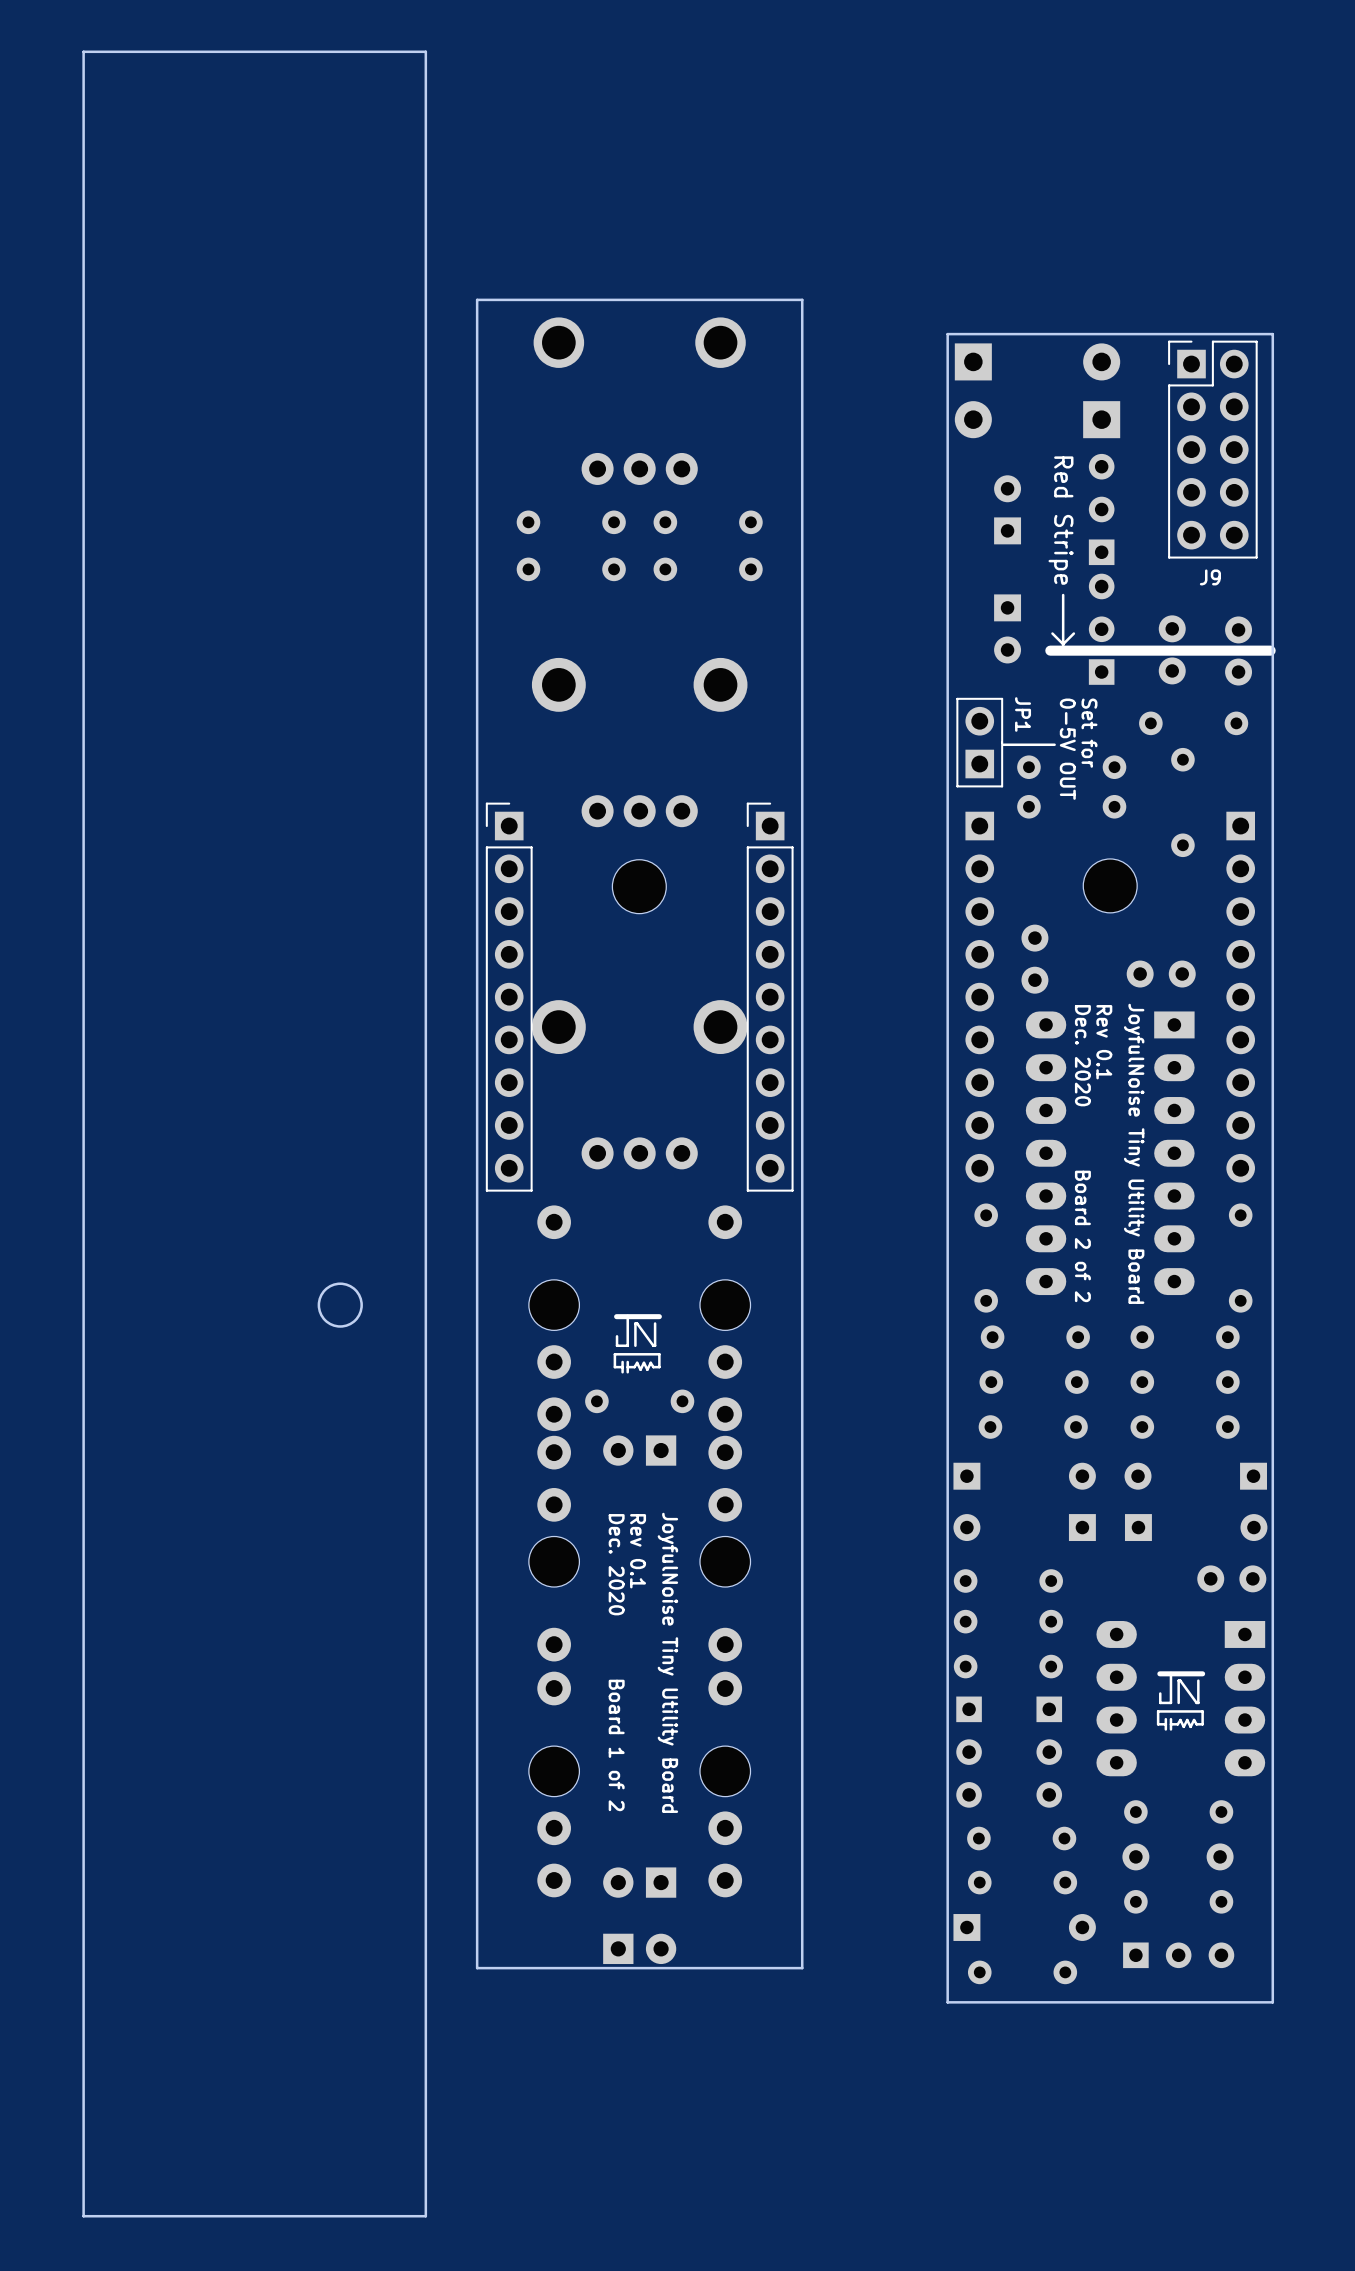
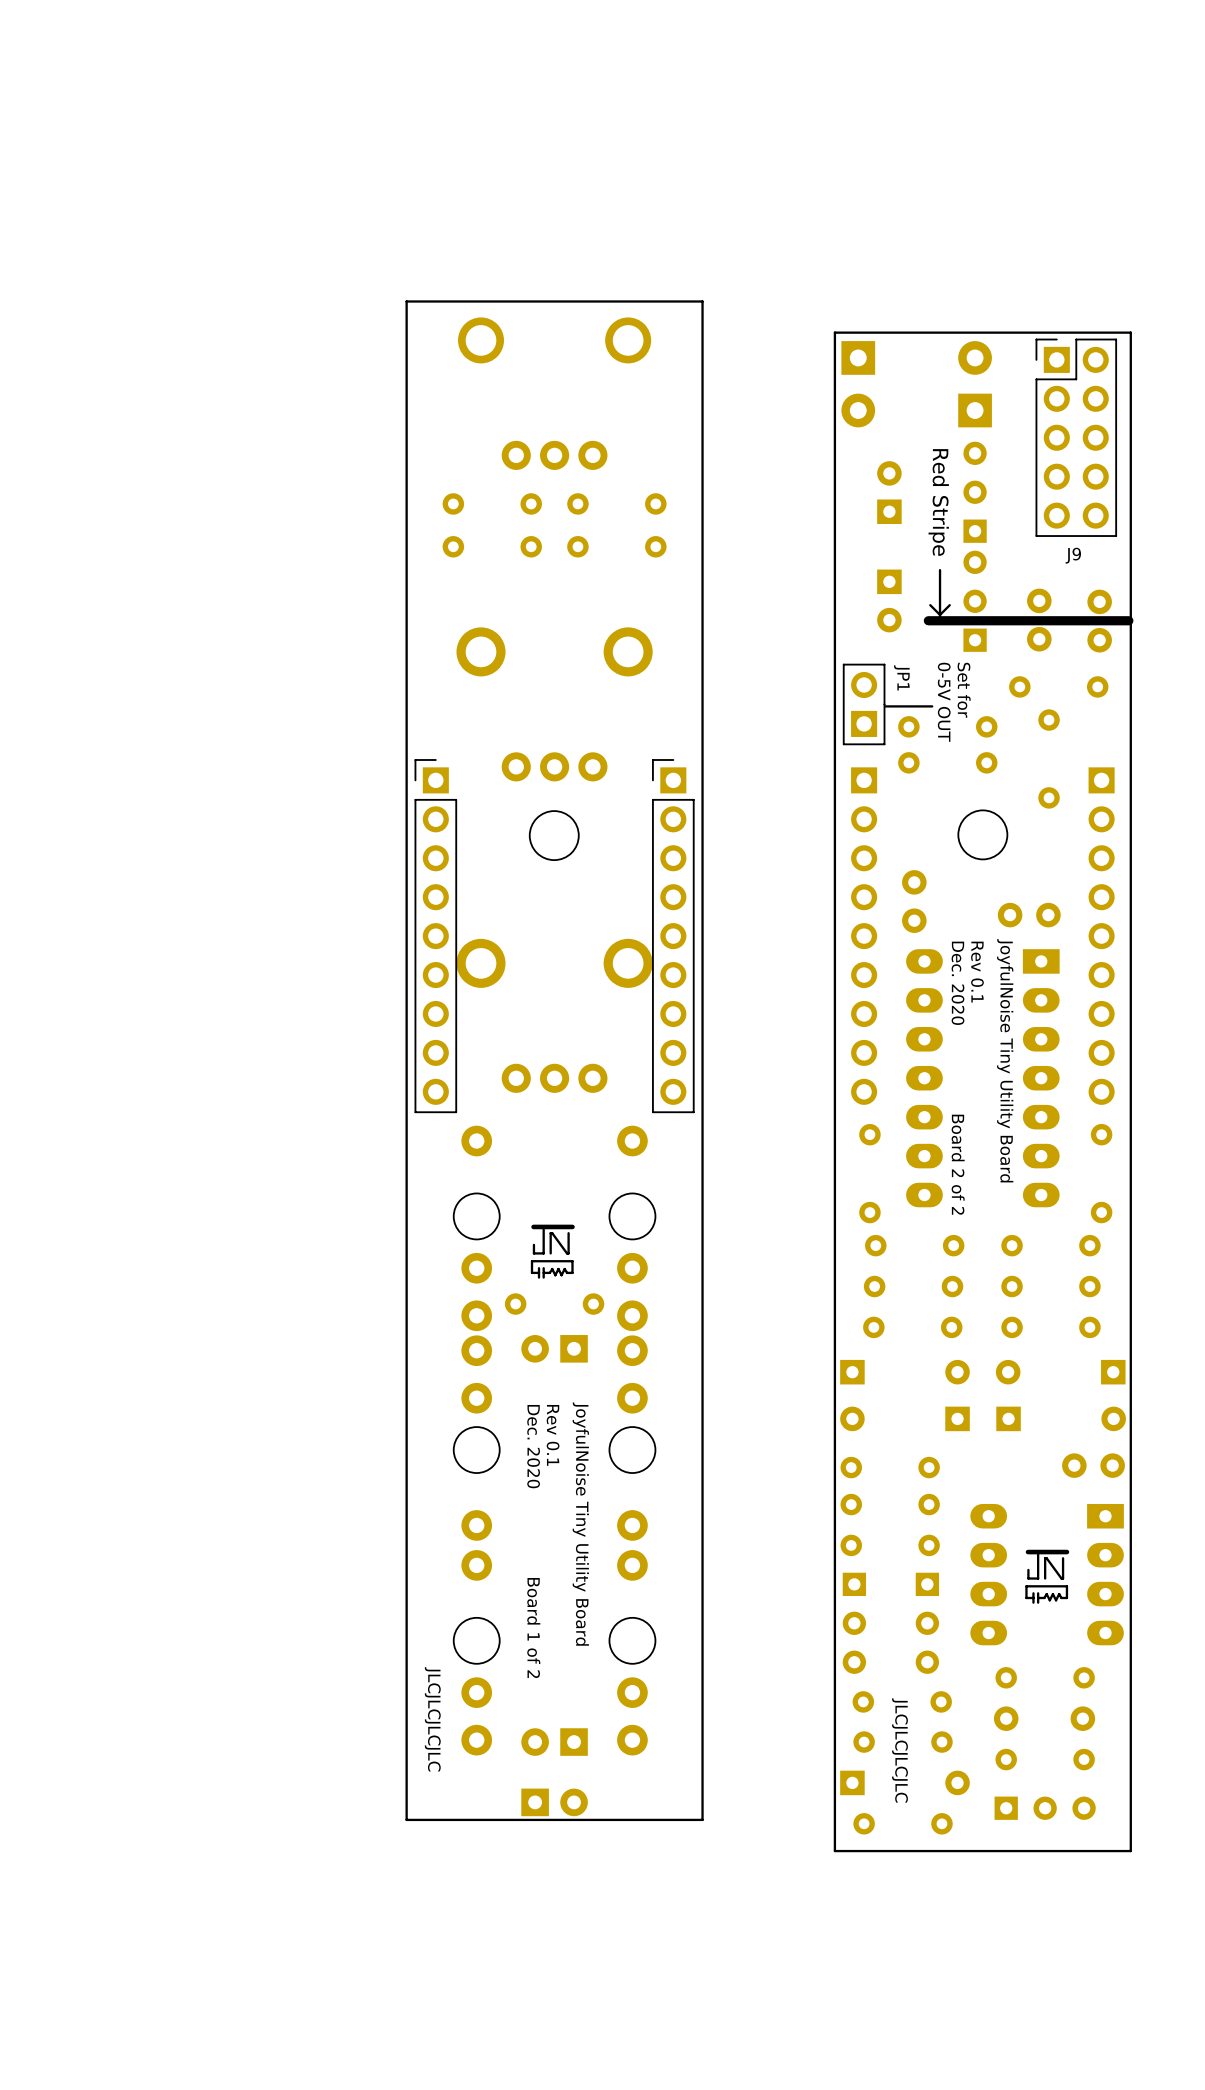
board edge: (425, 51) (83, 51) (83, 2216) (425, 2216) (425, 51) -> none
round board edge: [317, 1282, 363, 1328] -> none
text: none -> JLCJLCJLCJLC (432, 1719)
text: none -> JLCJLCJLCJLC (899, 1750)

